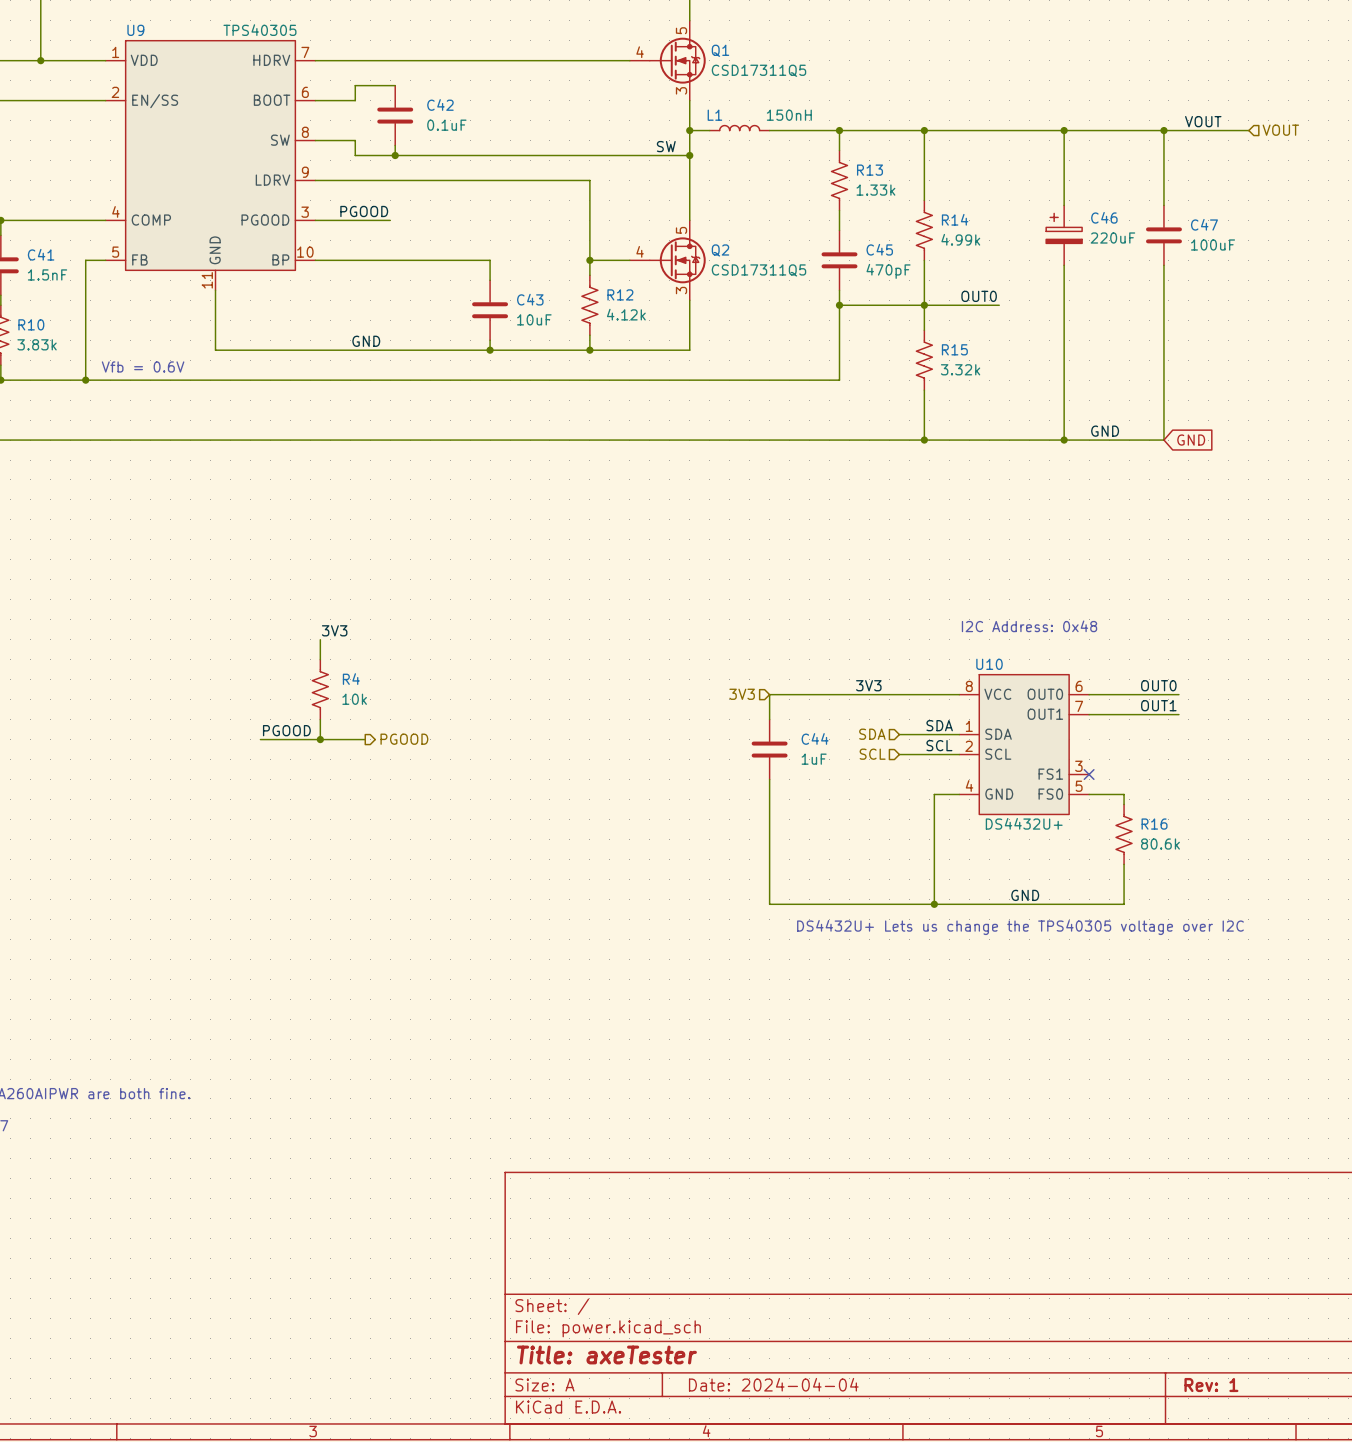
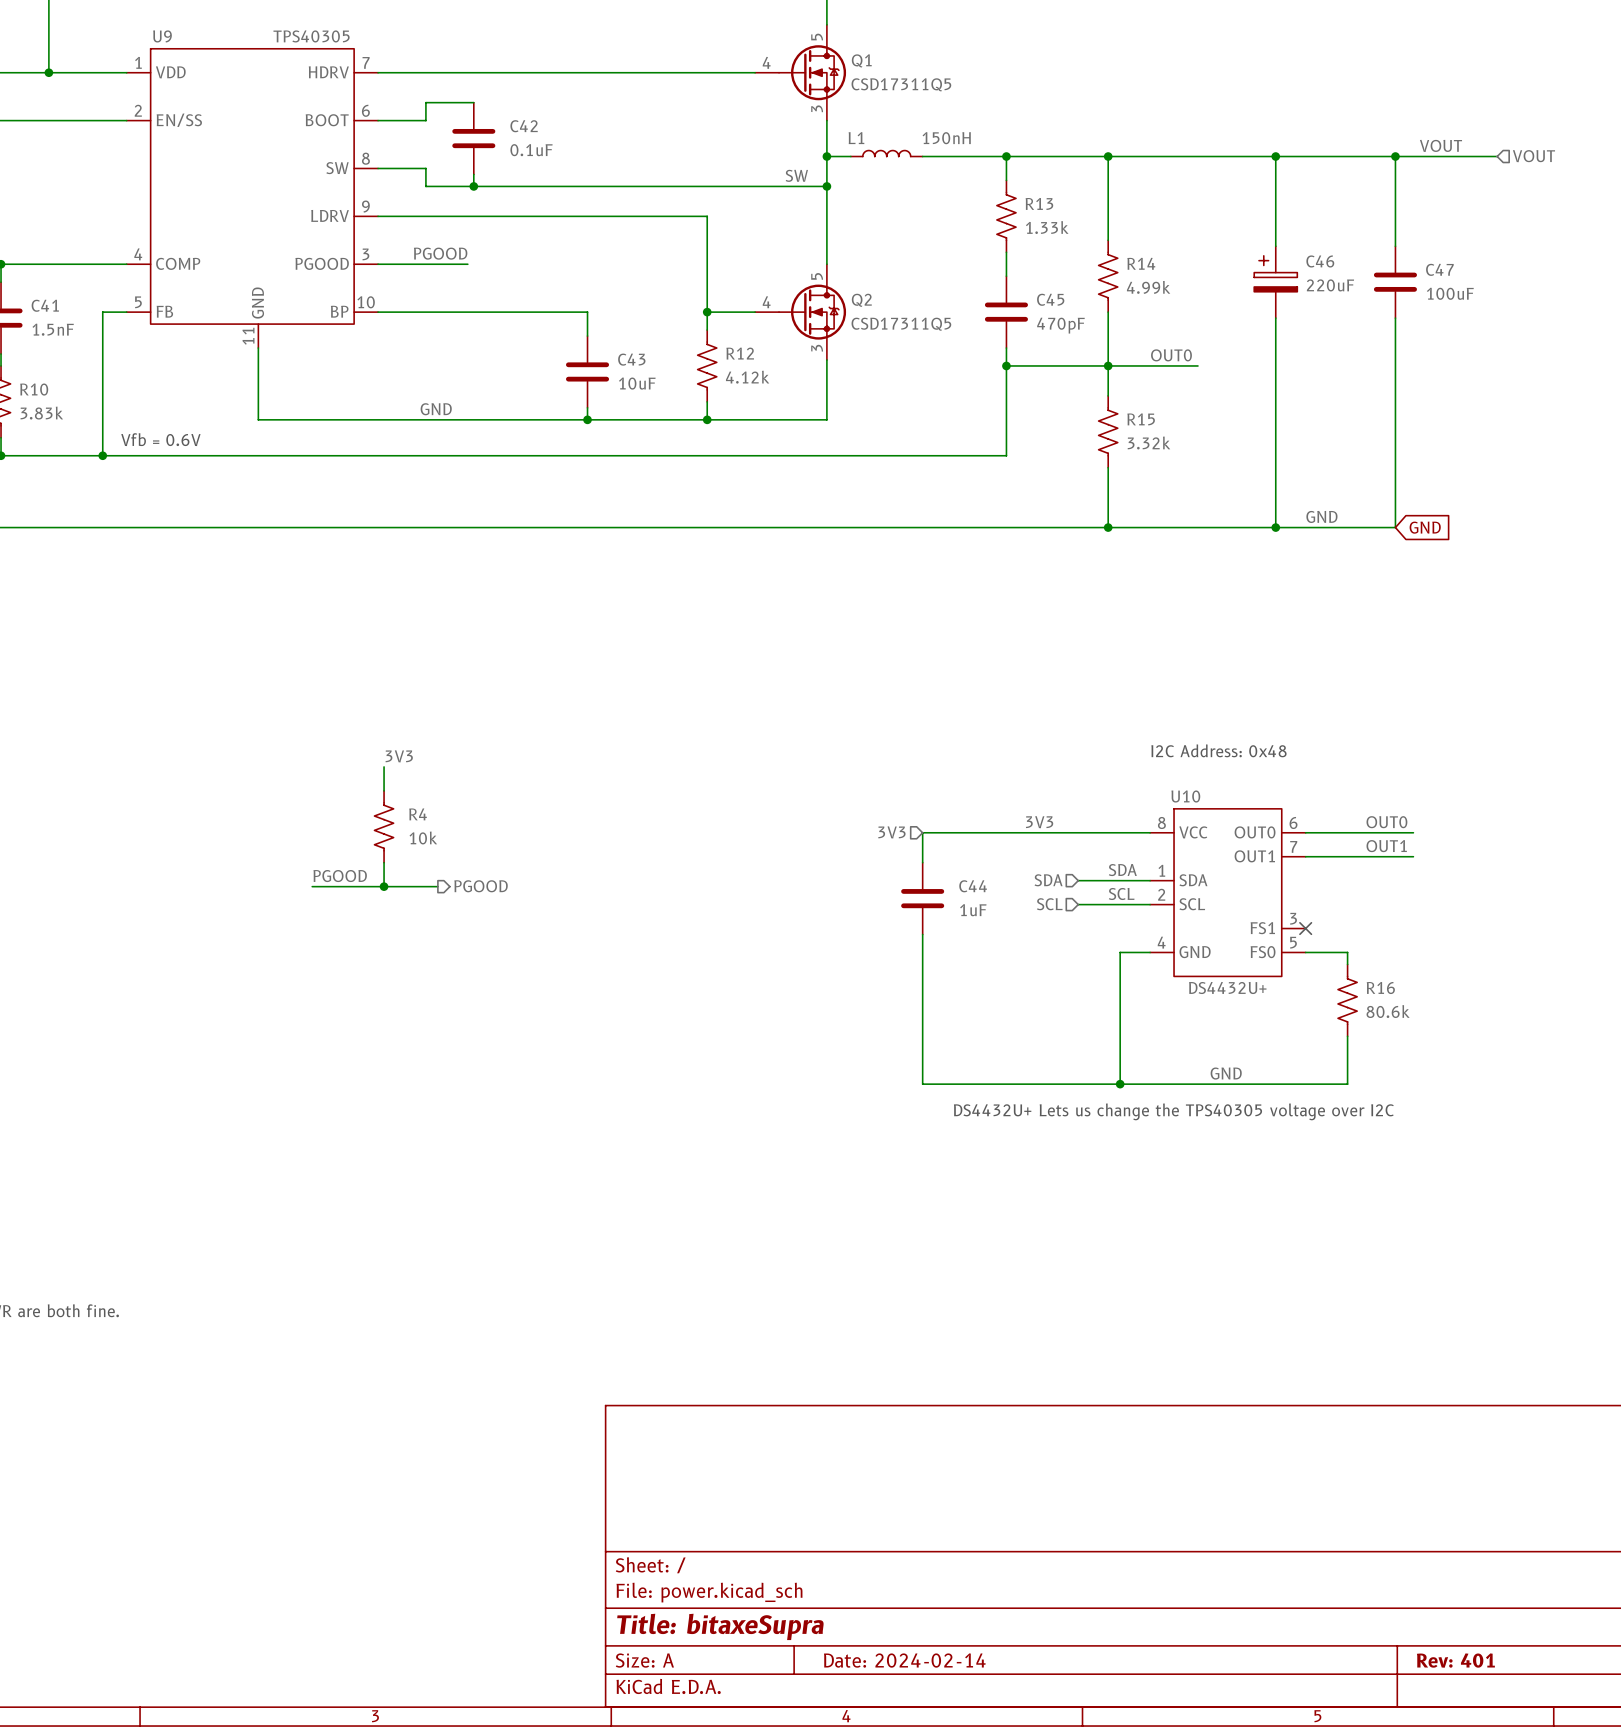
title block: Title: axeTester (606, 1355) -> Title: bitaxeSupra (720, 1626)
title block: Date: 2024-04-04 (773, 1384) -> Date: 2024-02-14 (904, 1660)
title block: Rev: 1 (1211, 1385) -> Rev: 401 (1455, 1660)

